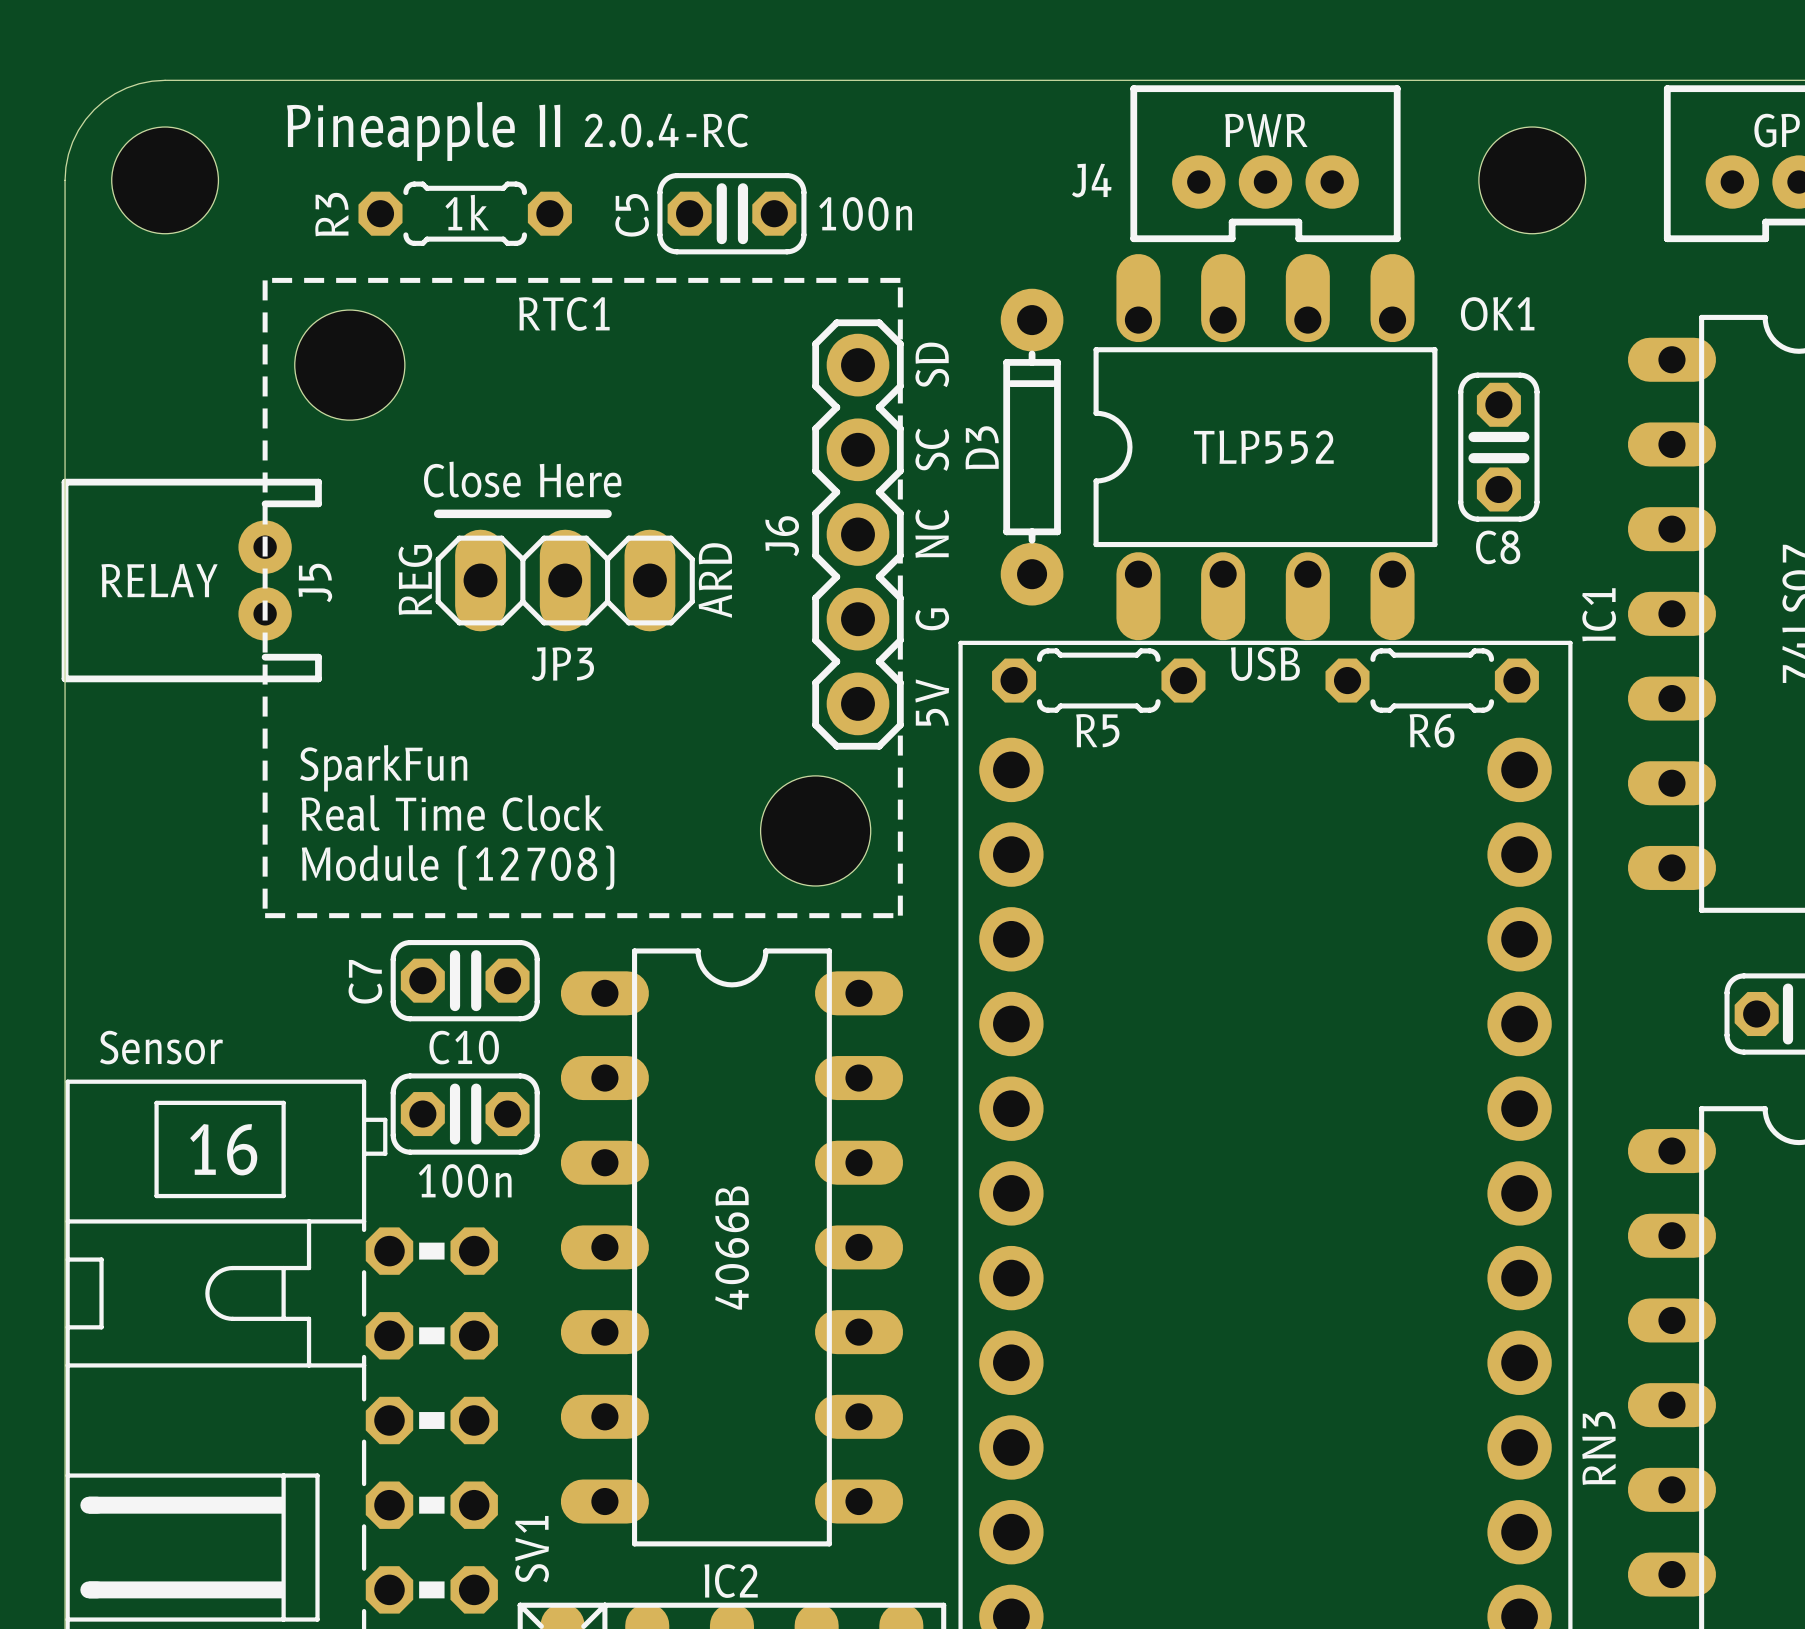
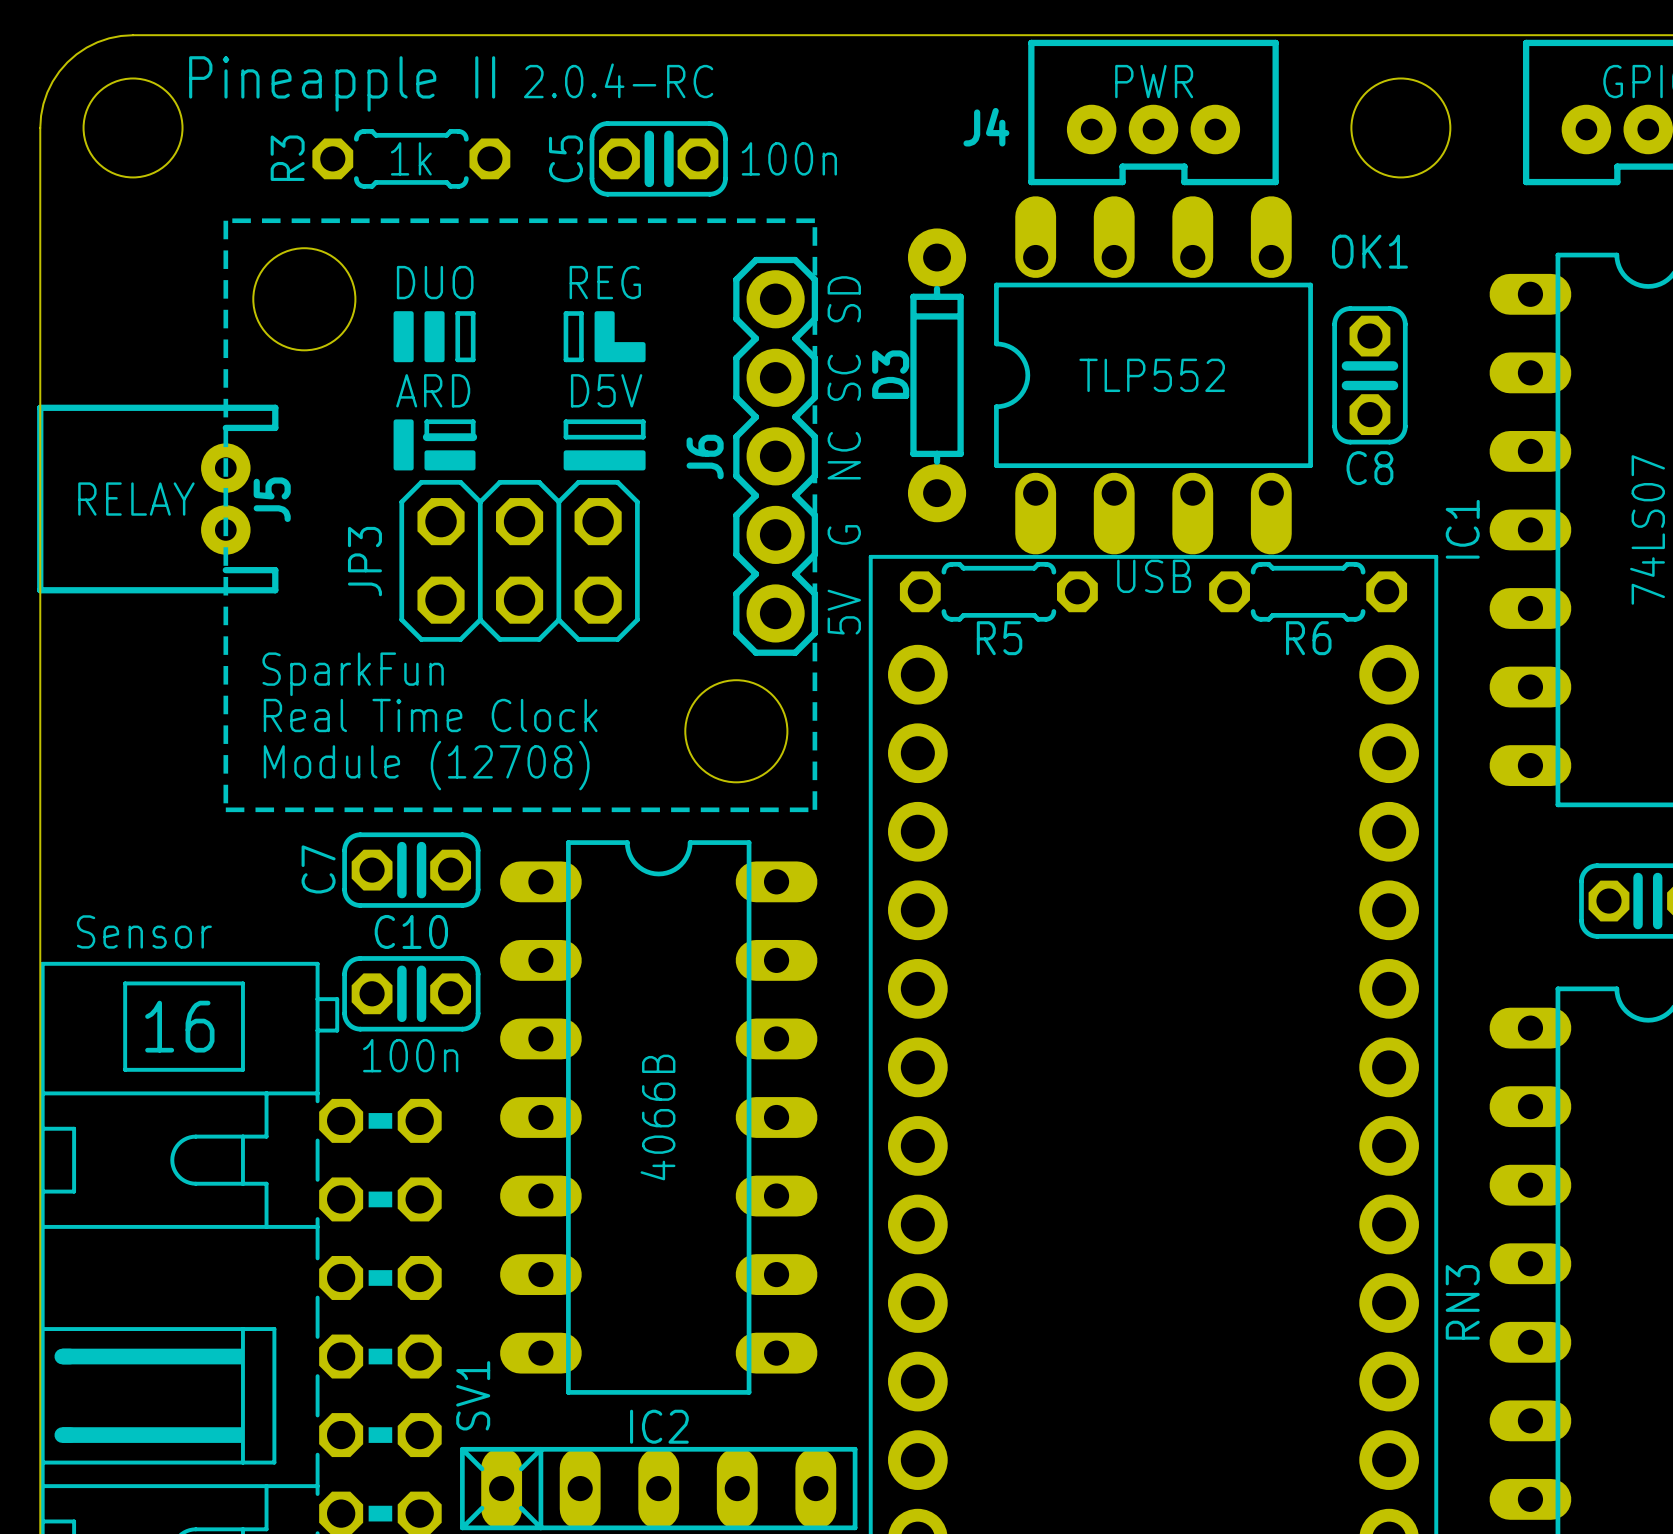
text: RTC1 (564, 313) -> none
text: none -> DUO (435, 282)
drawing: none -> [393, 311, 445, 363]
drawing: none -> [594, 311, 646, 363]
line: none -> (457, 313) (457, 359) (473, 359) (473, 313) (457, 313)
line: none -> (565, 313) (581, 313) (581, 359) (565, 359) (565, 313)
text: none -> D5V (606, 390)
text: Close Here (522, 479) -> none
drawing: none -> [393, 419, 476, 471]
line: none -> (565, 421) (643, 421) (643, 437) (565, 437) (565, 421)
line: (438, 513) (481, 513) -> (473, 437) (473, 421) (426, 421) (426, 437)
line: (531, 513) (607, 513) -> none
drawing: none -> [563, 450, 646, 471]
JP3 footprint: [435, 529, 695, 632] -> [399, 479, 640, 642]
text rotation: 0° (415, 579) -> 90° clockwise (605, 282)
text position: REG (415, 579) -> REG (605, 282)
text rotation: 0° (715, 580) -> 90° clockwise (433, 390)
text position: ARD (715, 580) -> ARD (433, 390)
JP3 name position: JP3 (562, 664) -> JP3 (364, 561)

